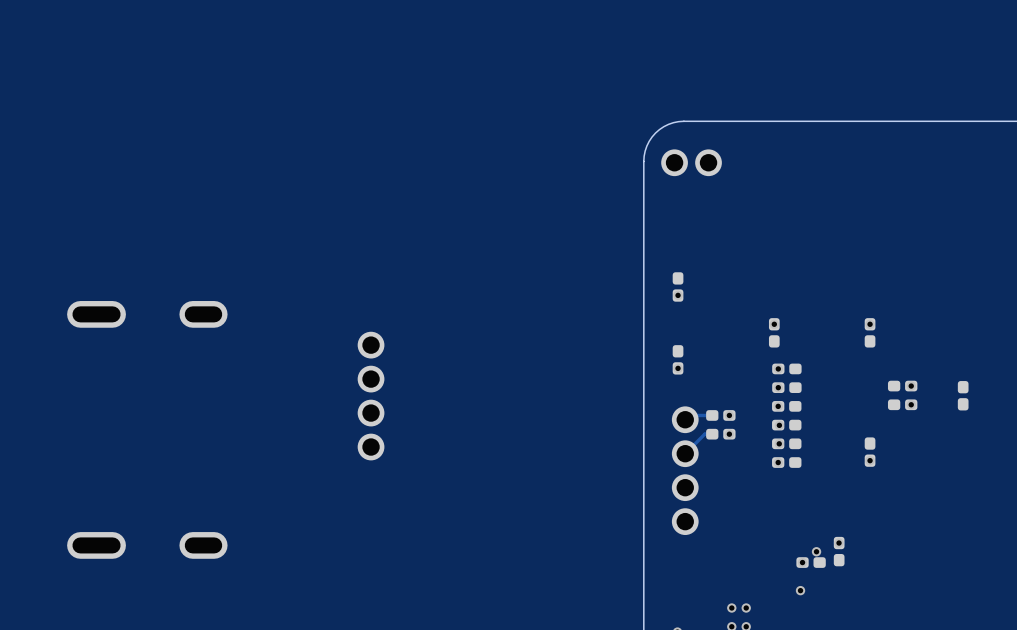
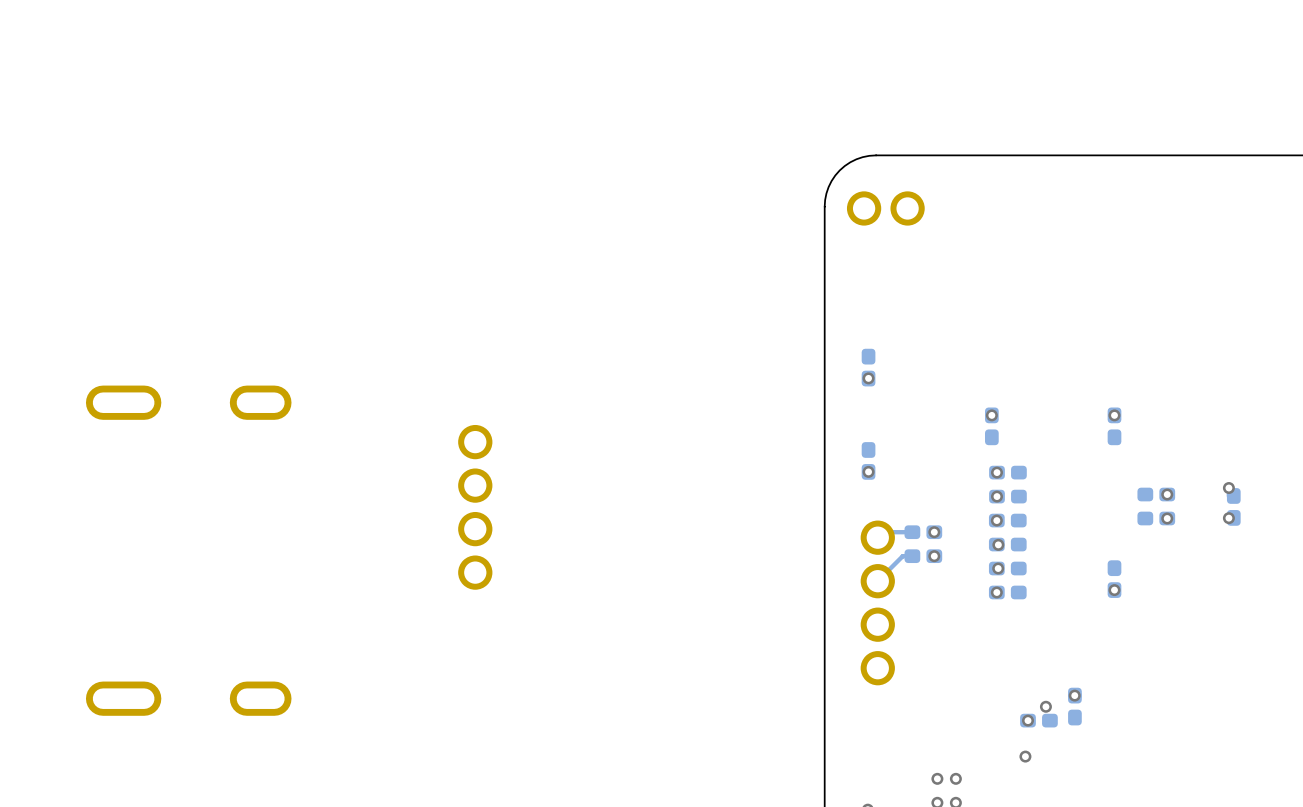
via: none -> (1228, 488)
via: none -> (1228, 518)

